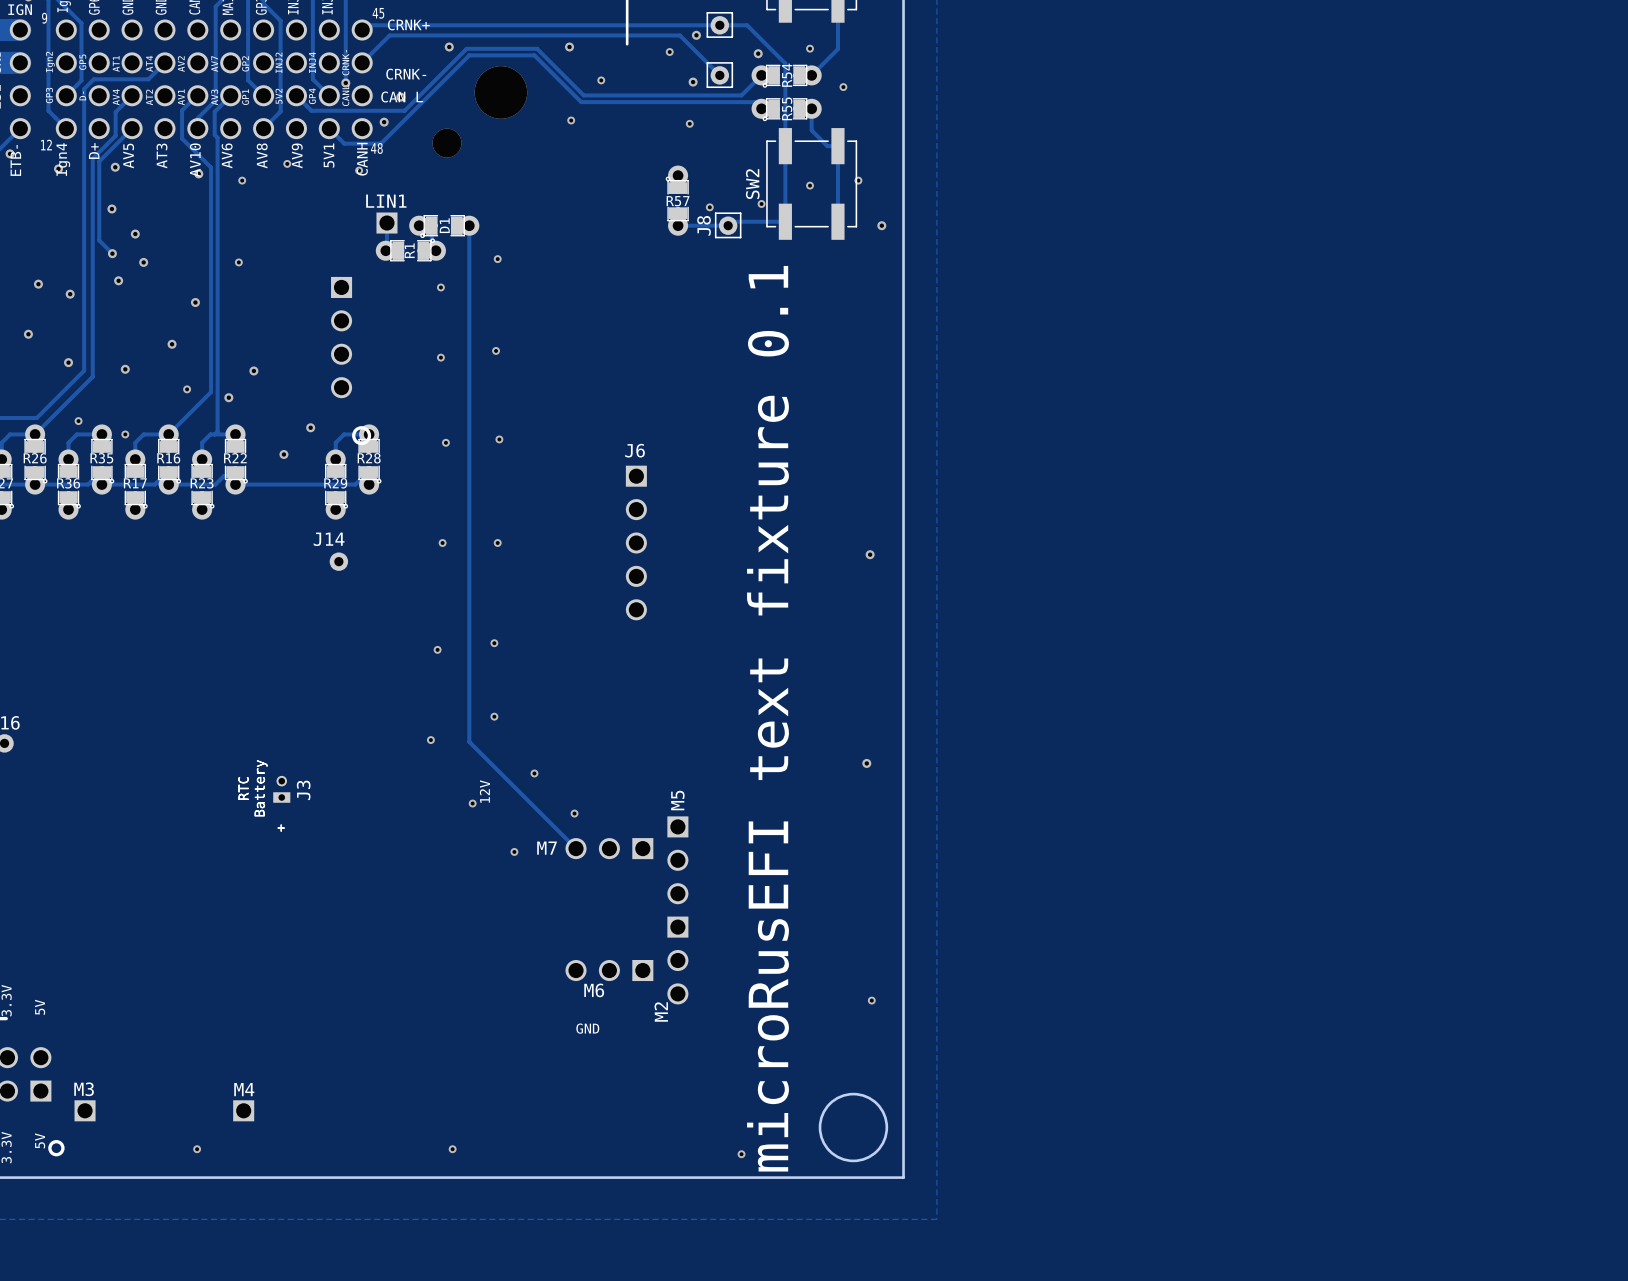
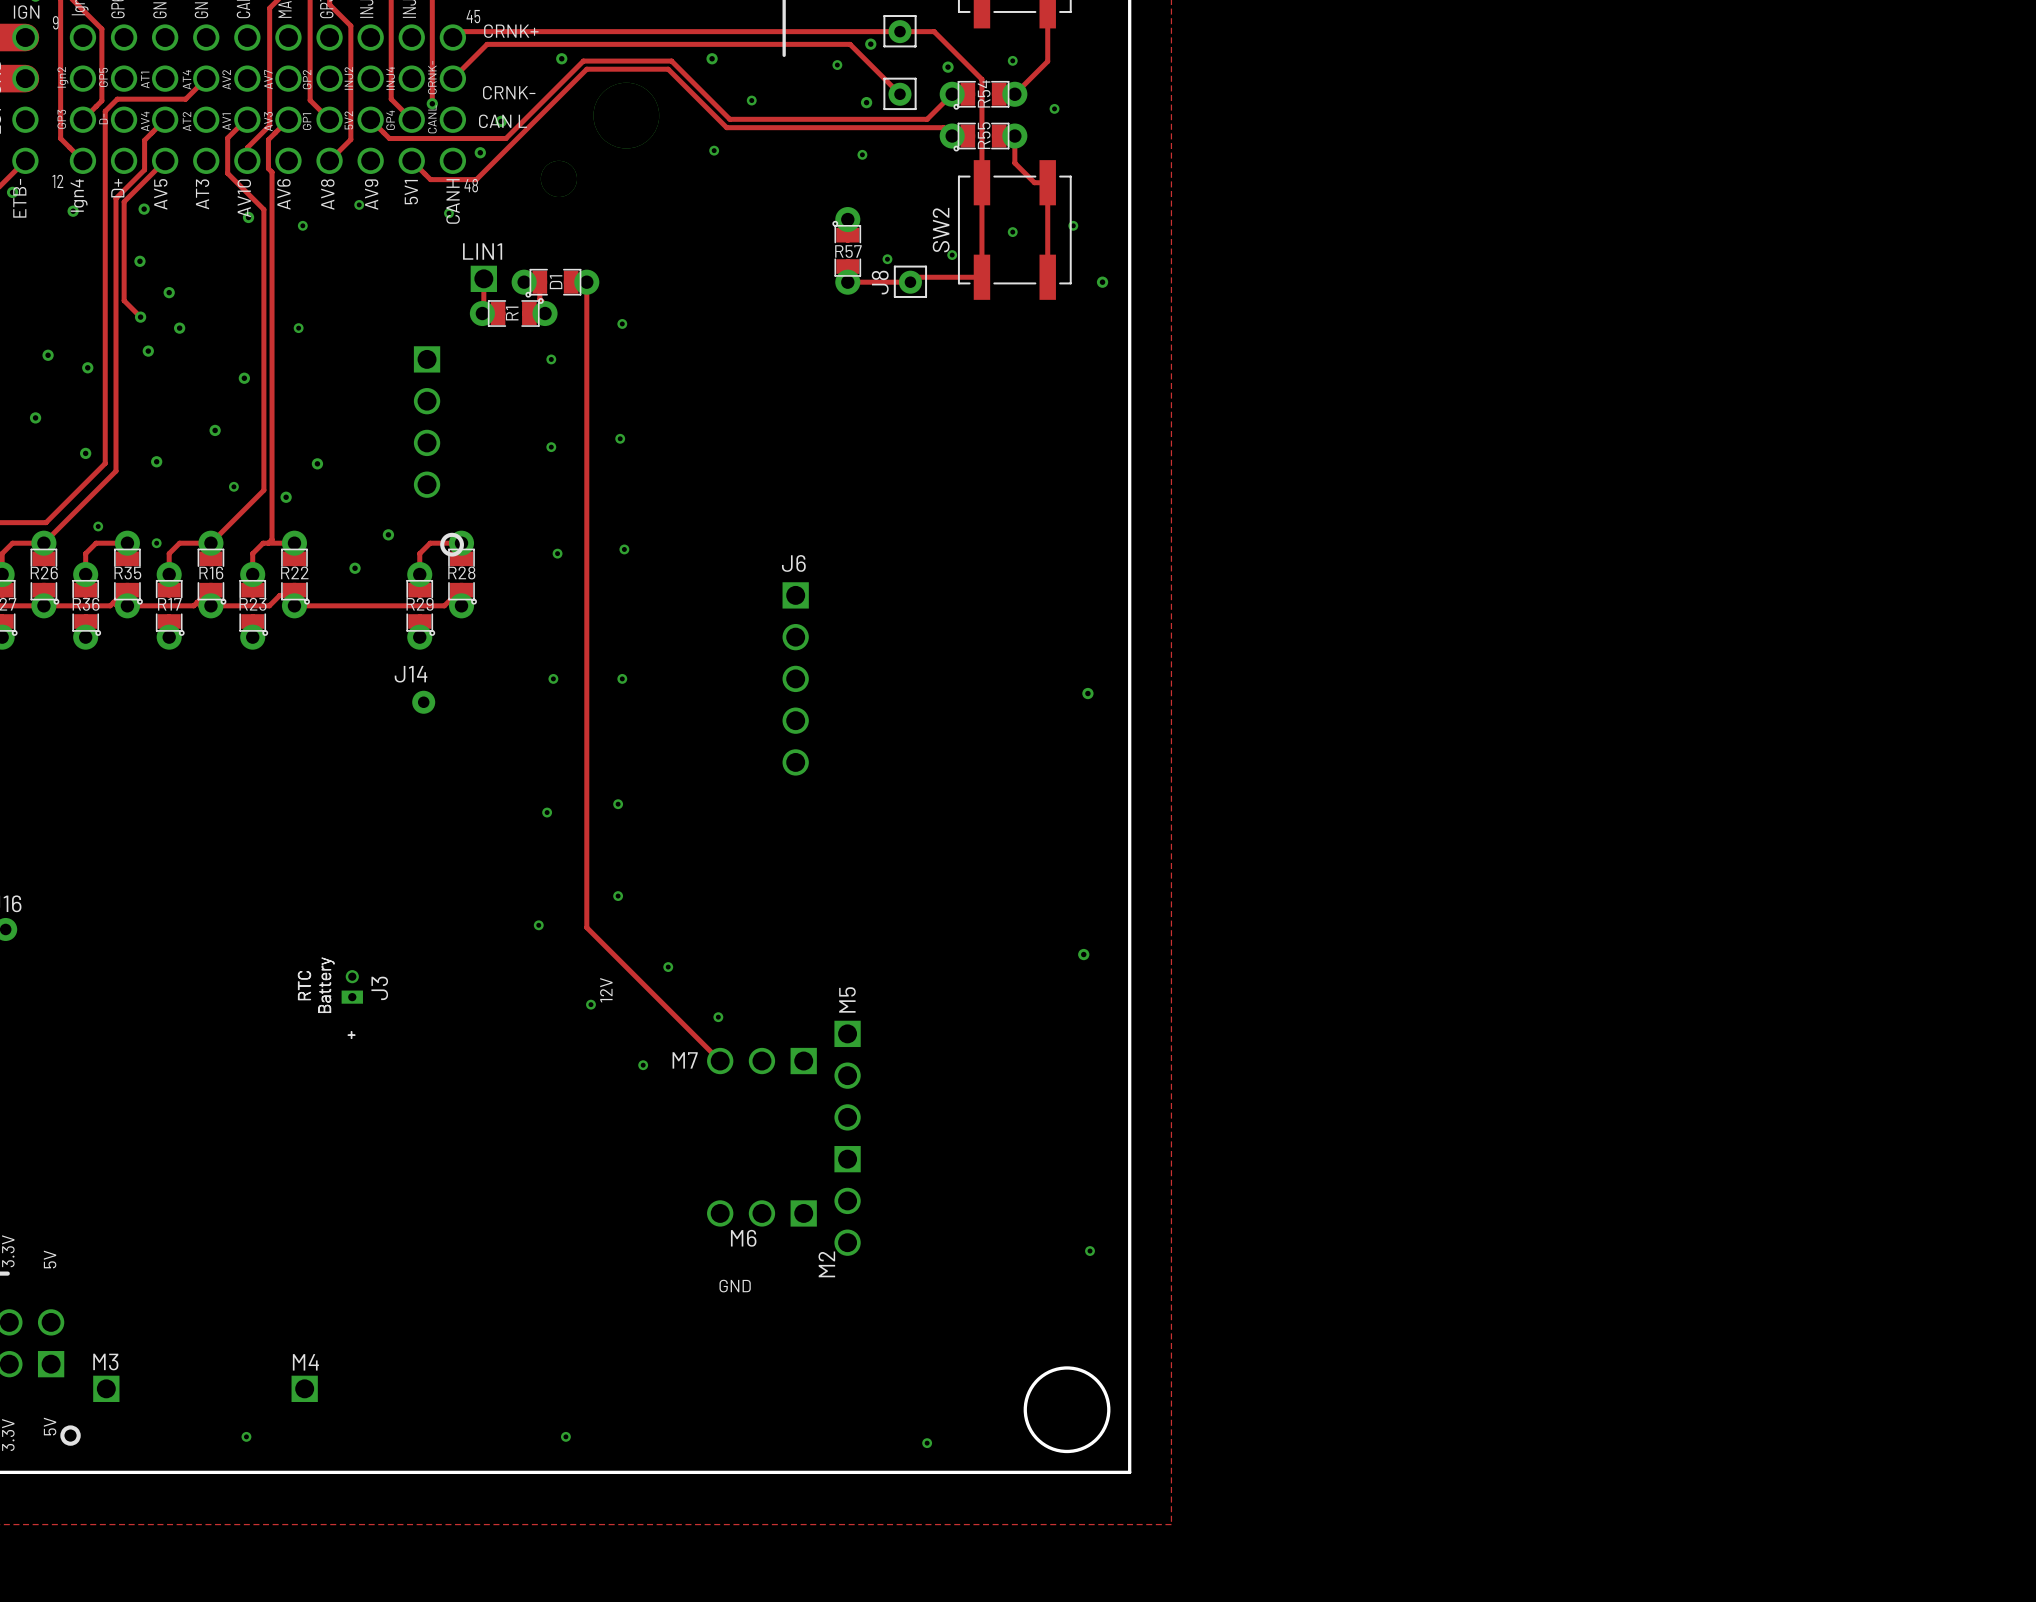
text: microRusEFI text fixture 0.1 (768, 718) -> none

